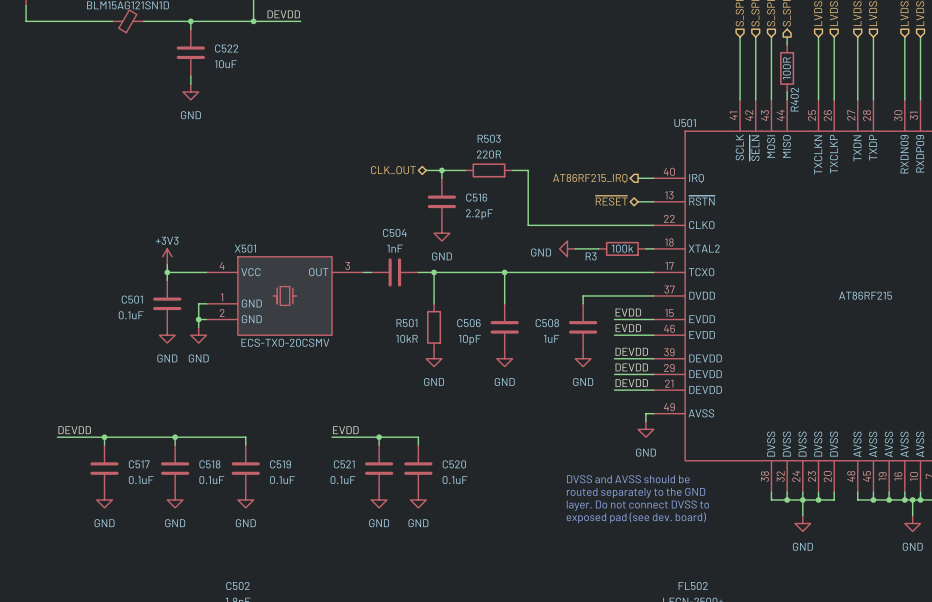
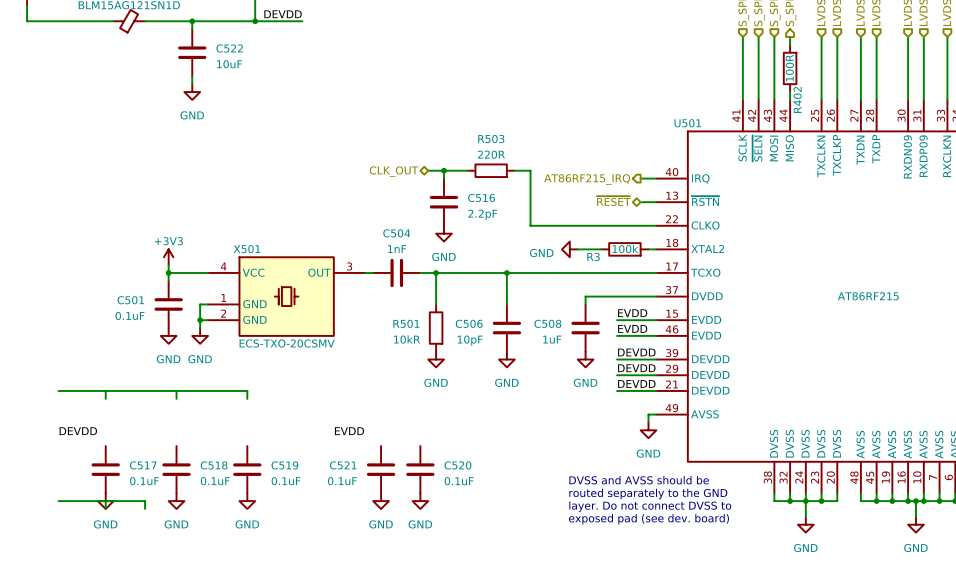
wire: (57, 437) (245, 437) (245, 445) -> (58, 390) (247, 390) (247, 398)
wire: (104, 437) (104, 445) -> (105, 390) (105, 398)
junction: (104, 437) -> none
wire: (175, 437) (175, 445) -> (176, 390) (176, 398)
junction: (175, 437) -> none
wire: (332, 437) (418, 437) (418, 445) -> none
wire: (379, 437) (379, 445) -> none
junction: (379, 437) -> none
wire: none -> (58, 501) (145, 501) (145, 508)
wire: none -> (105, 501) (105, 508)

